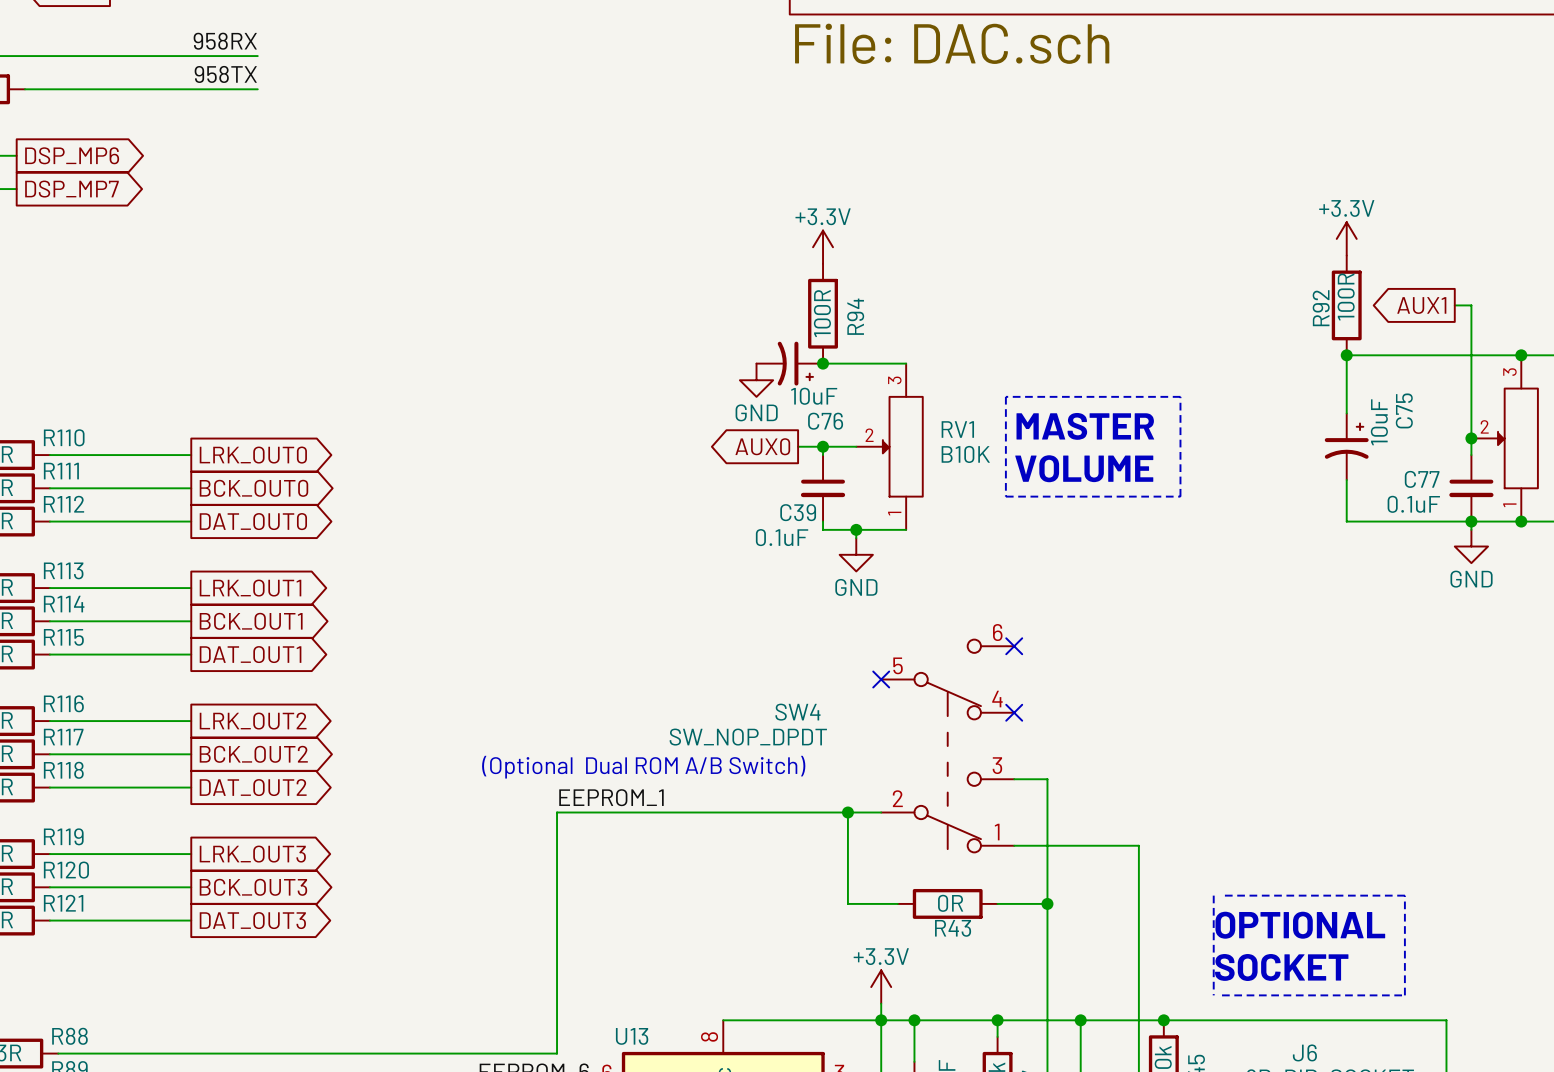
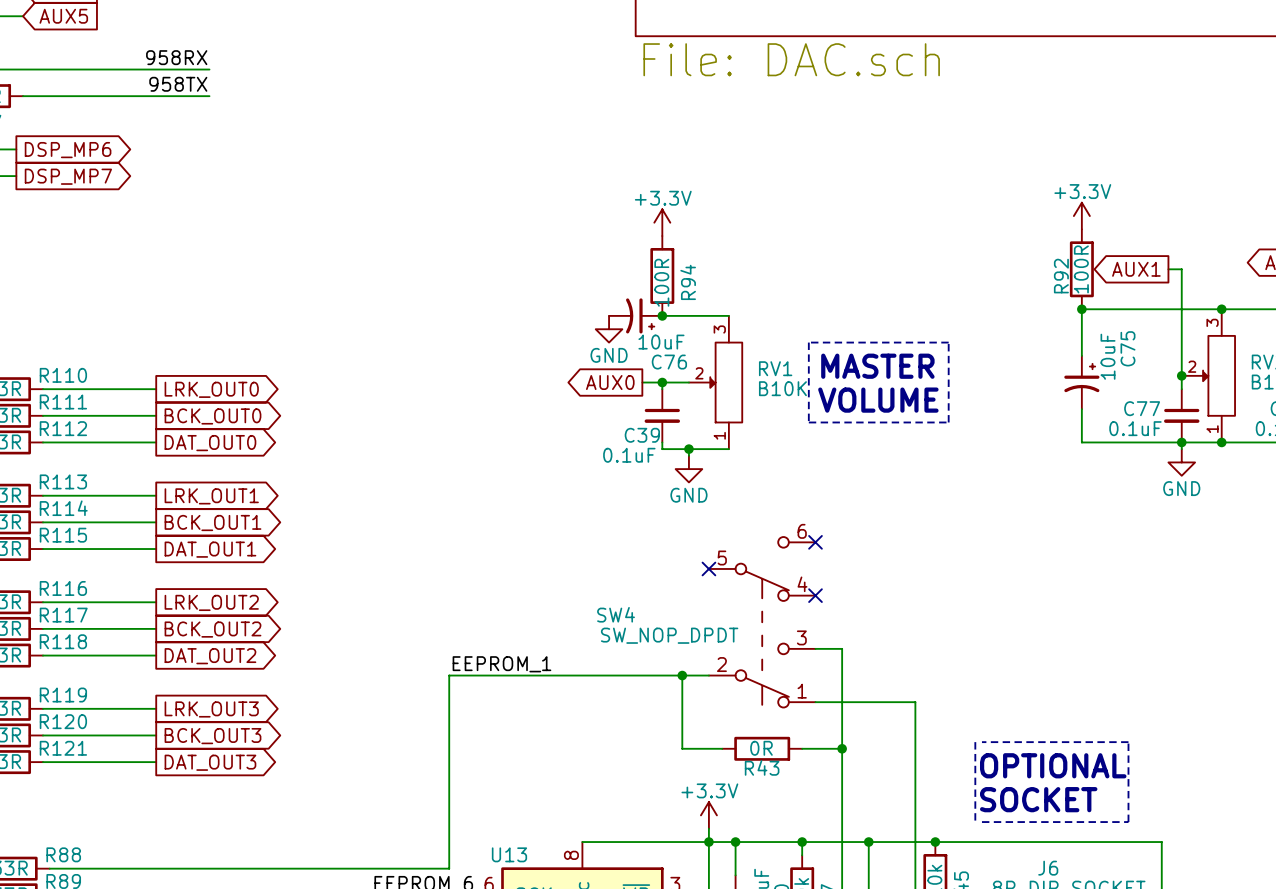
SW4 name position: SW4 (797, 712) -> SW4 (616, 614)
SW4 value position: SW_NOP_DPDT (748, 737) -> SW_NOP_DPDT (669, 635)
text: (Optional Dual ROM A/B Switch) (643, 767) -> none

